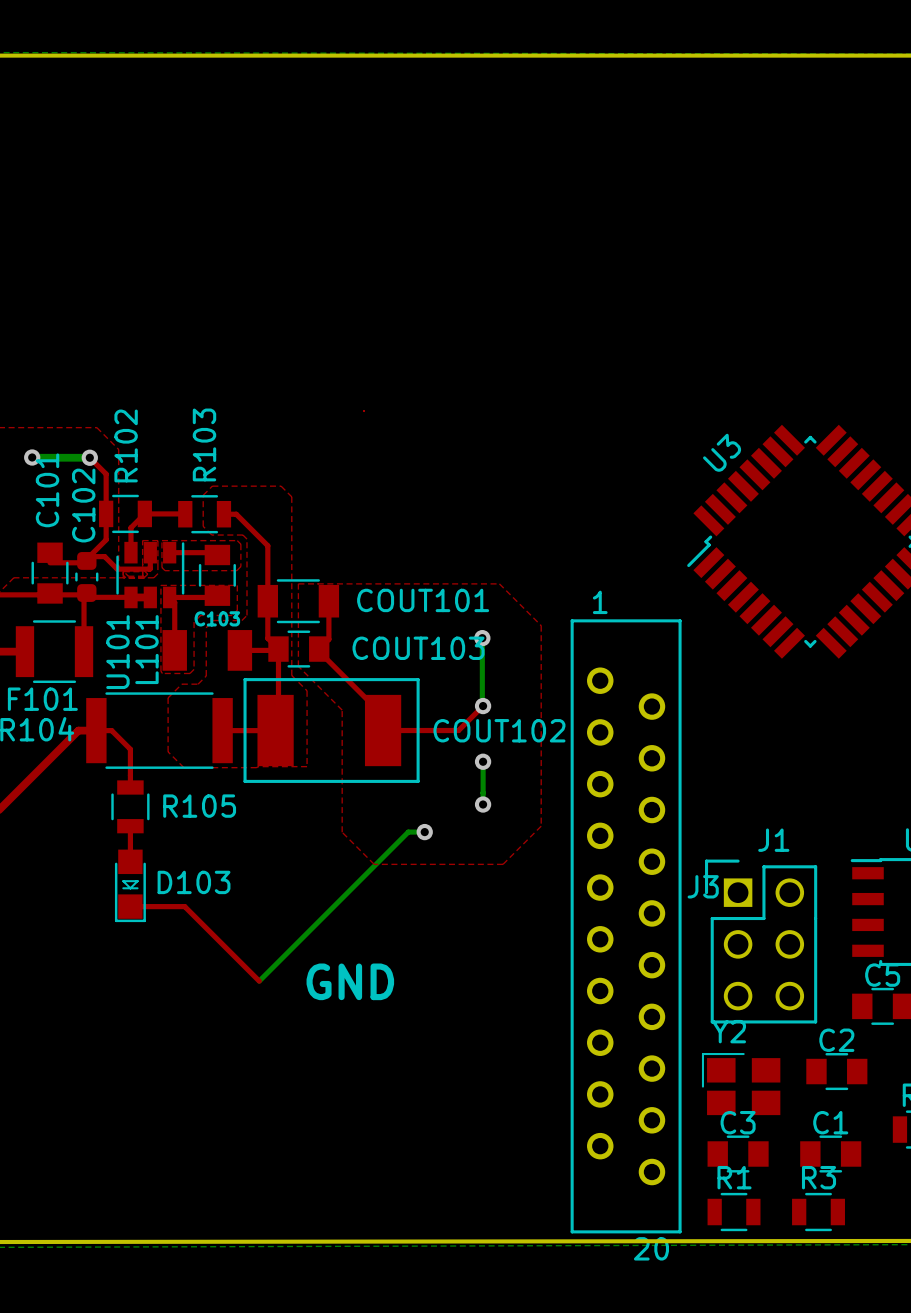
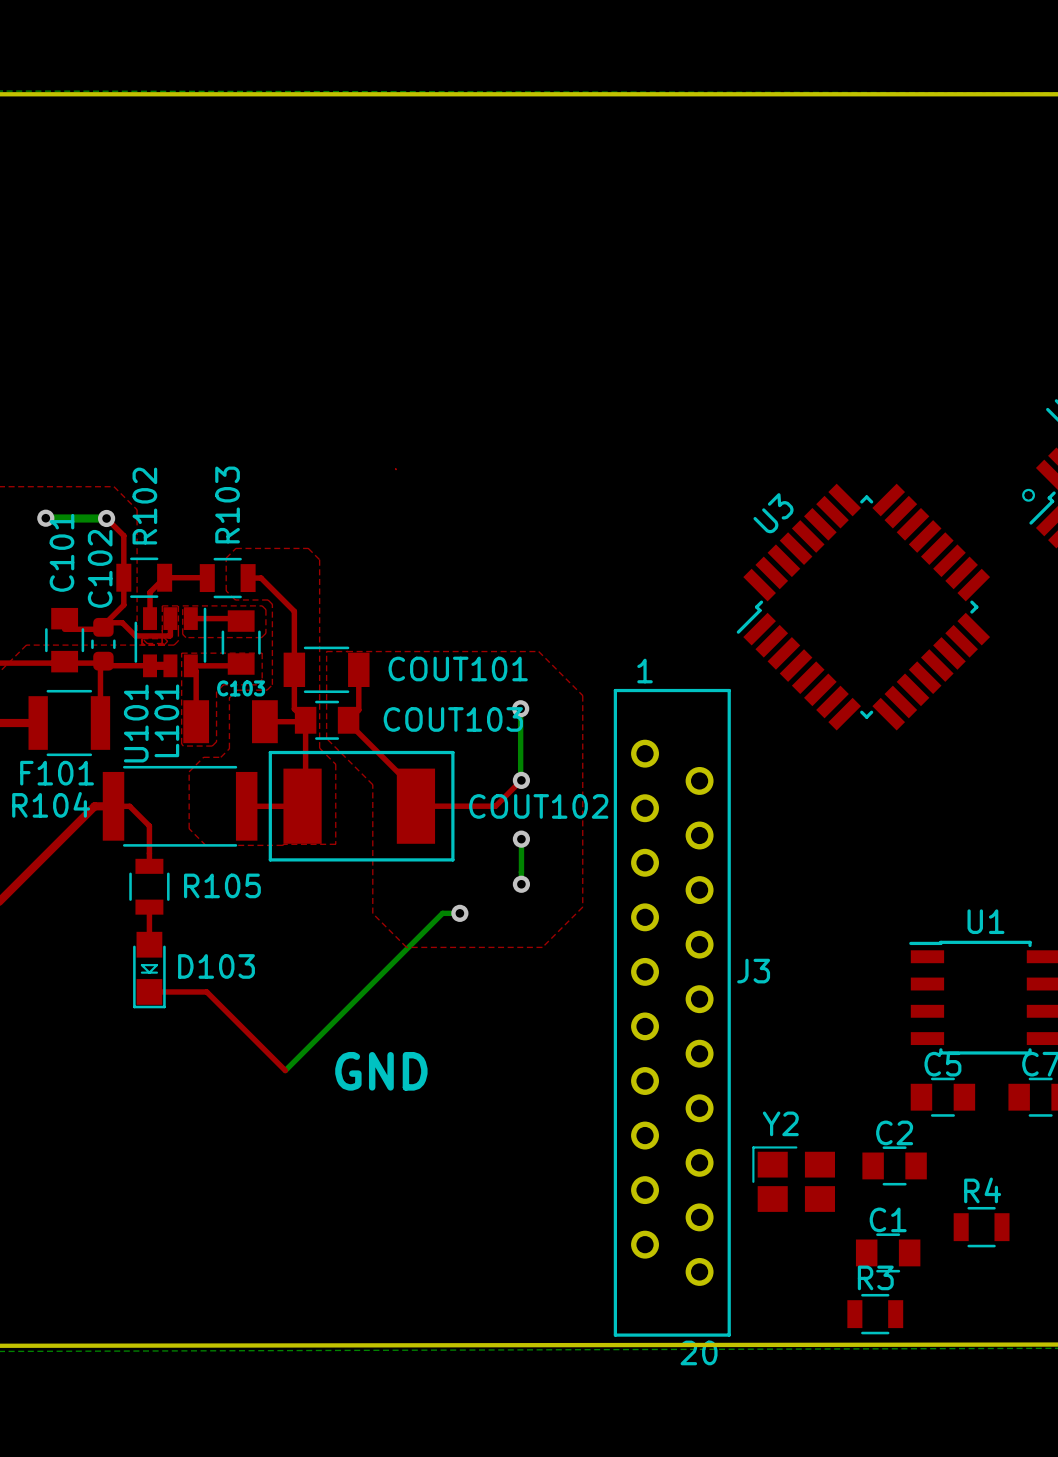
J1: (761, 941) -> none
C3: (738, 1154) -> none
R1: (734, 1212) -> none

